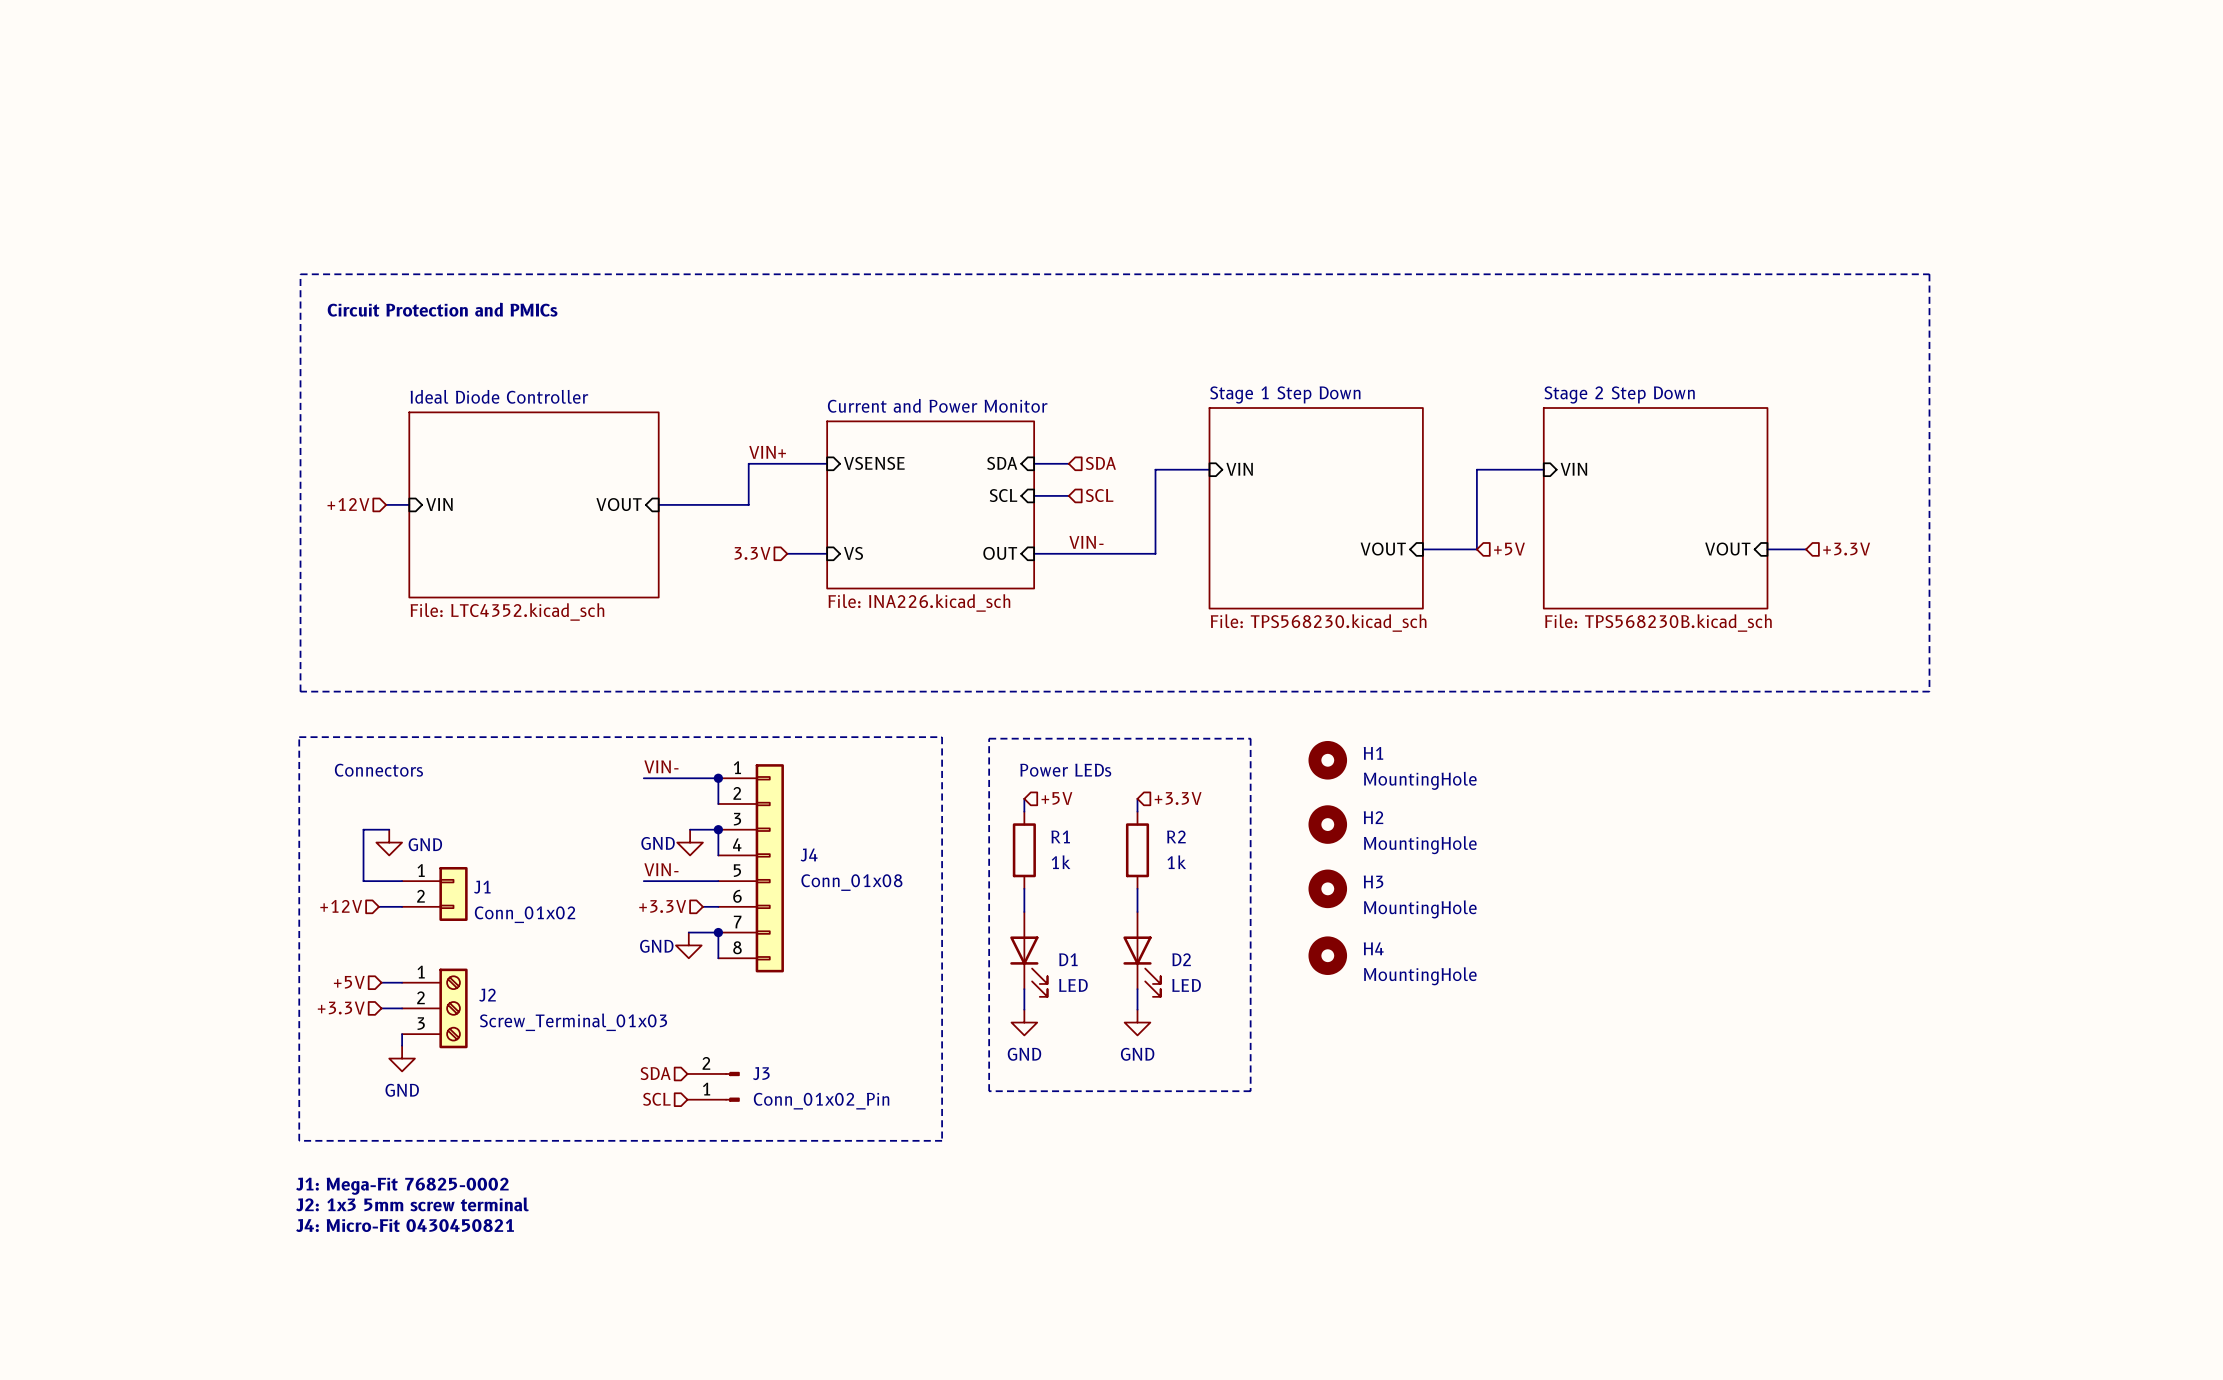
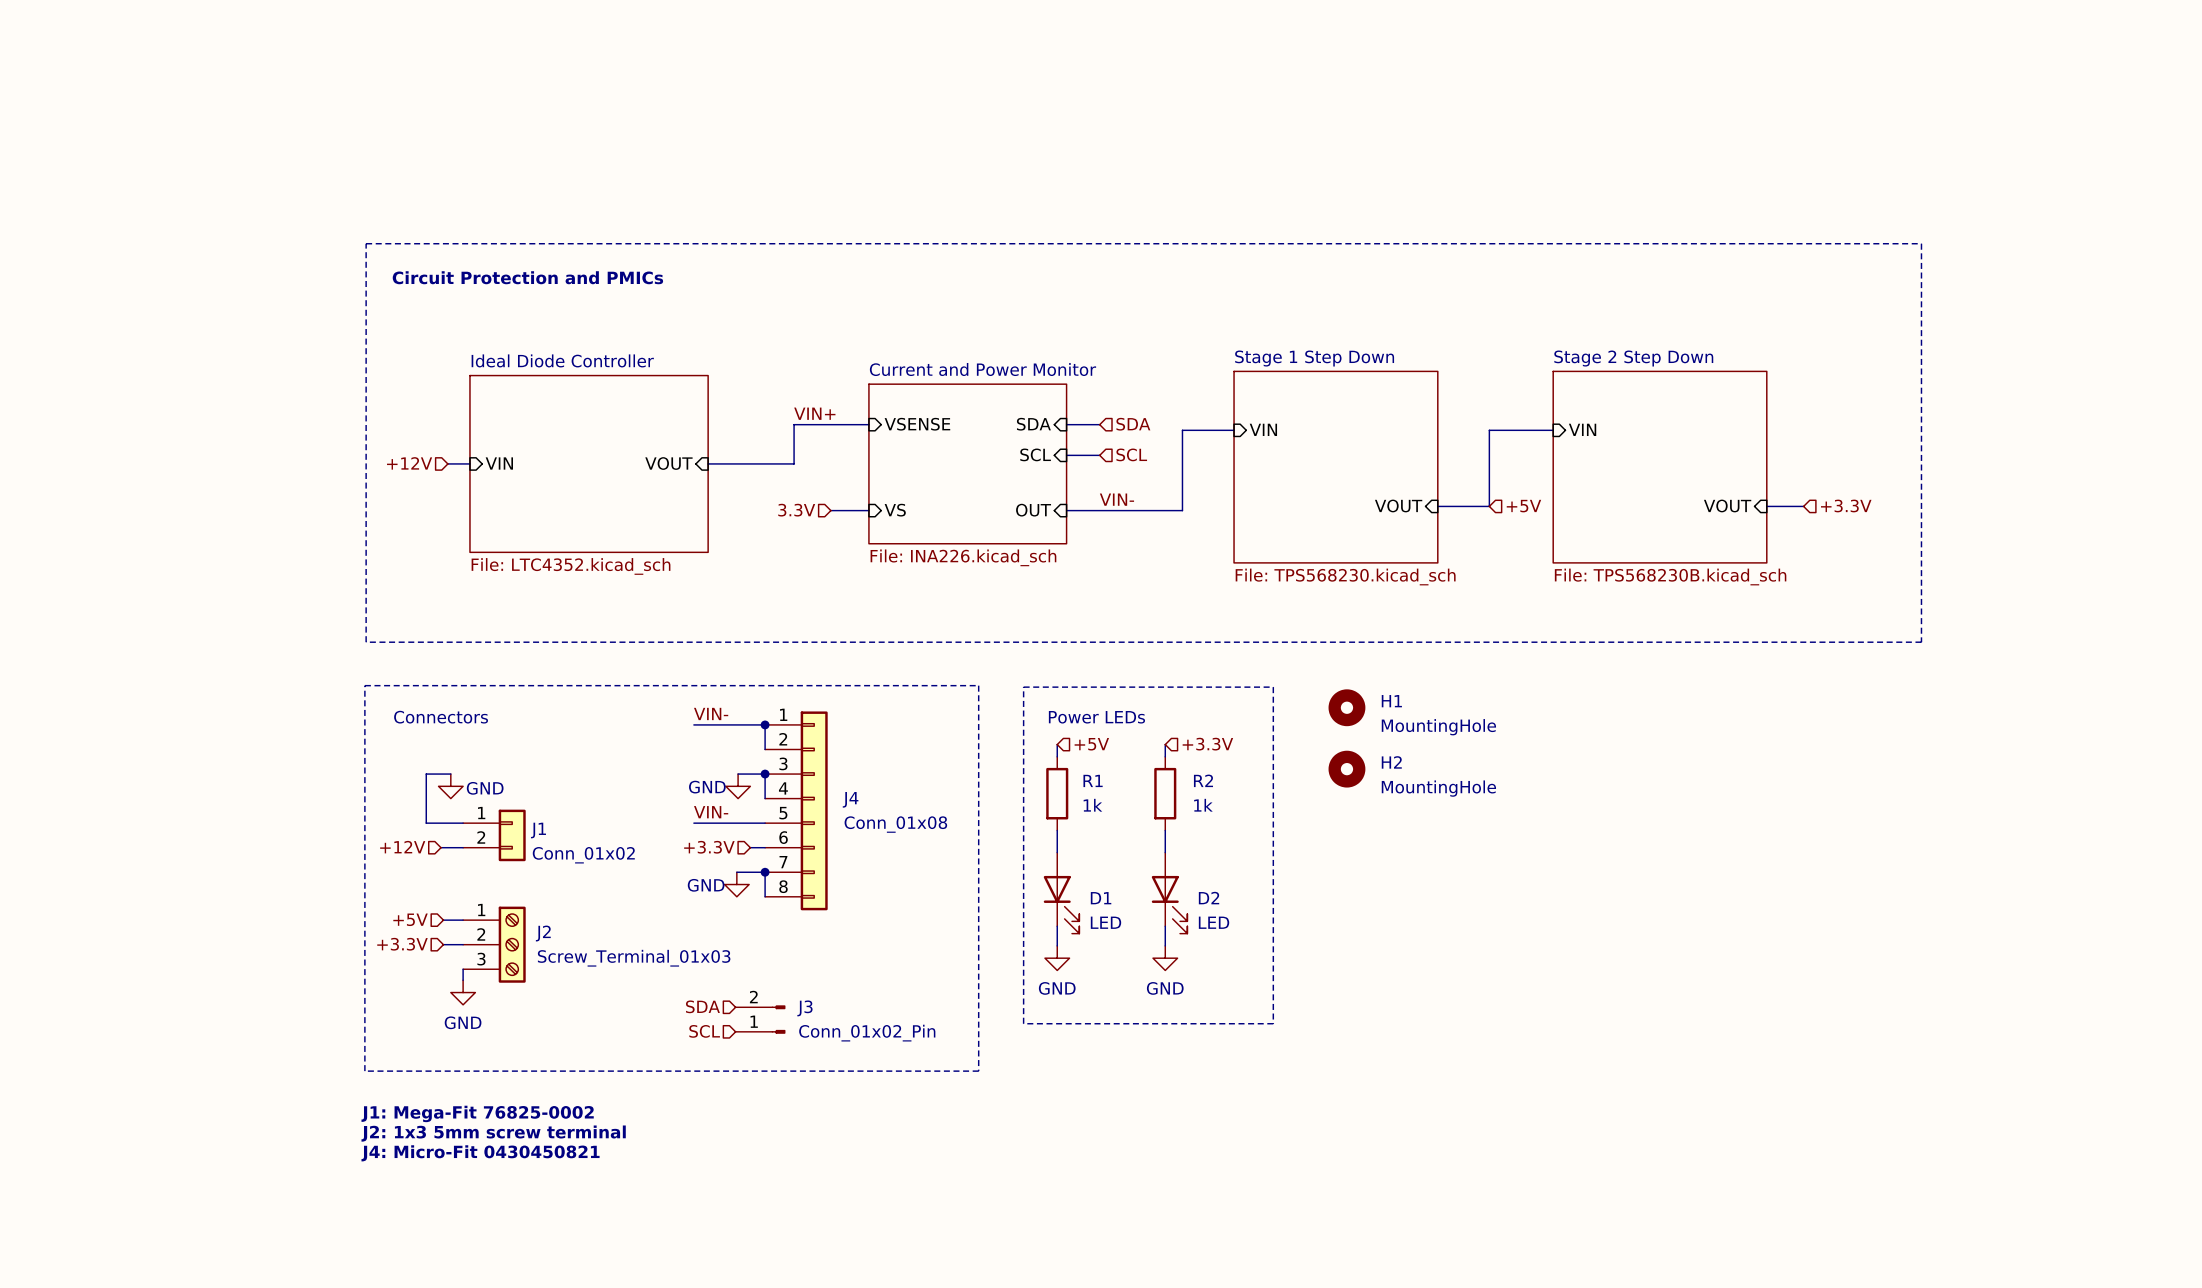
H3: MountingHole (1327, 888) -> none
H4: MountingHole (1327, 955) -> none

